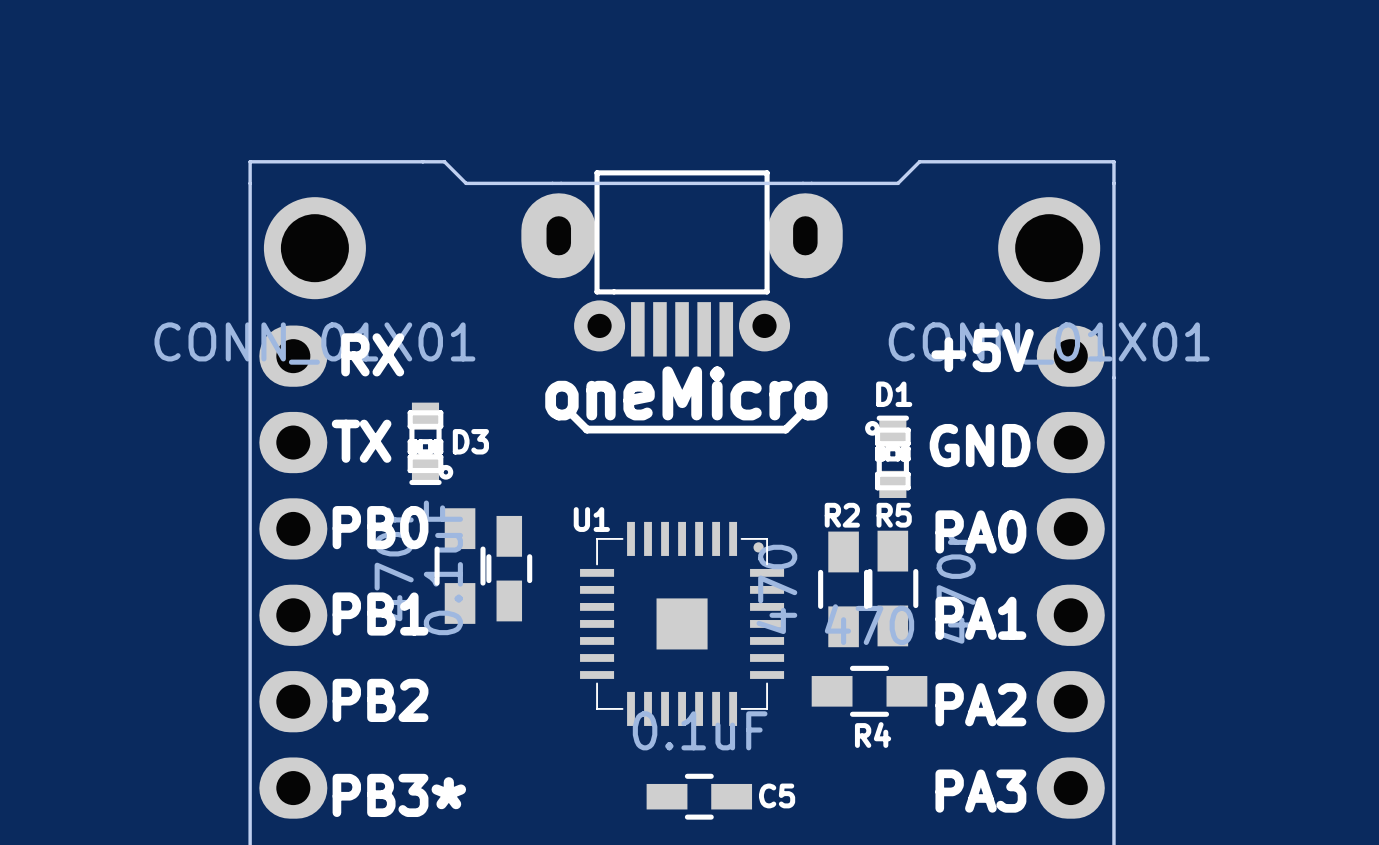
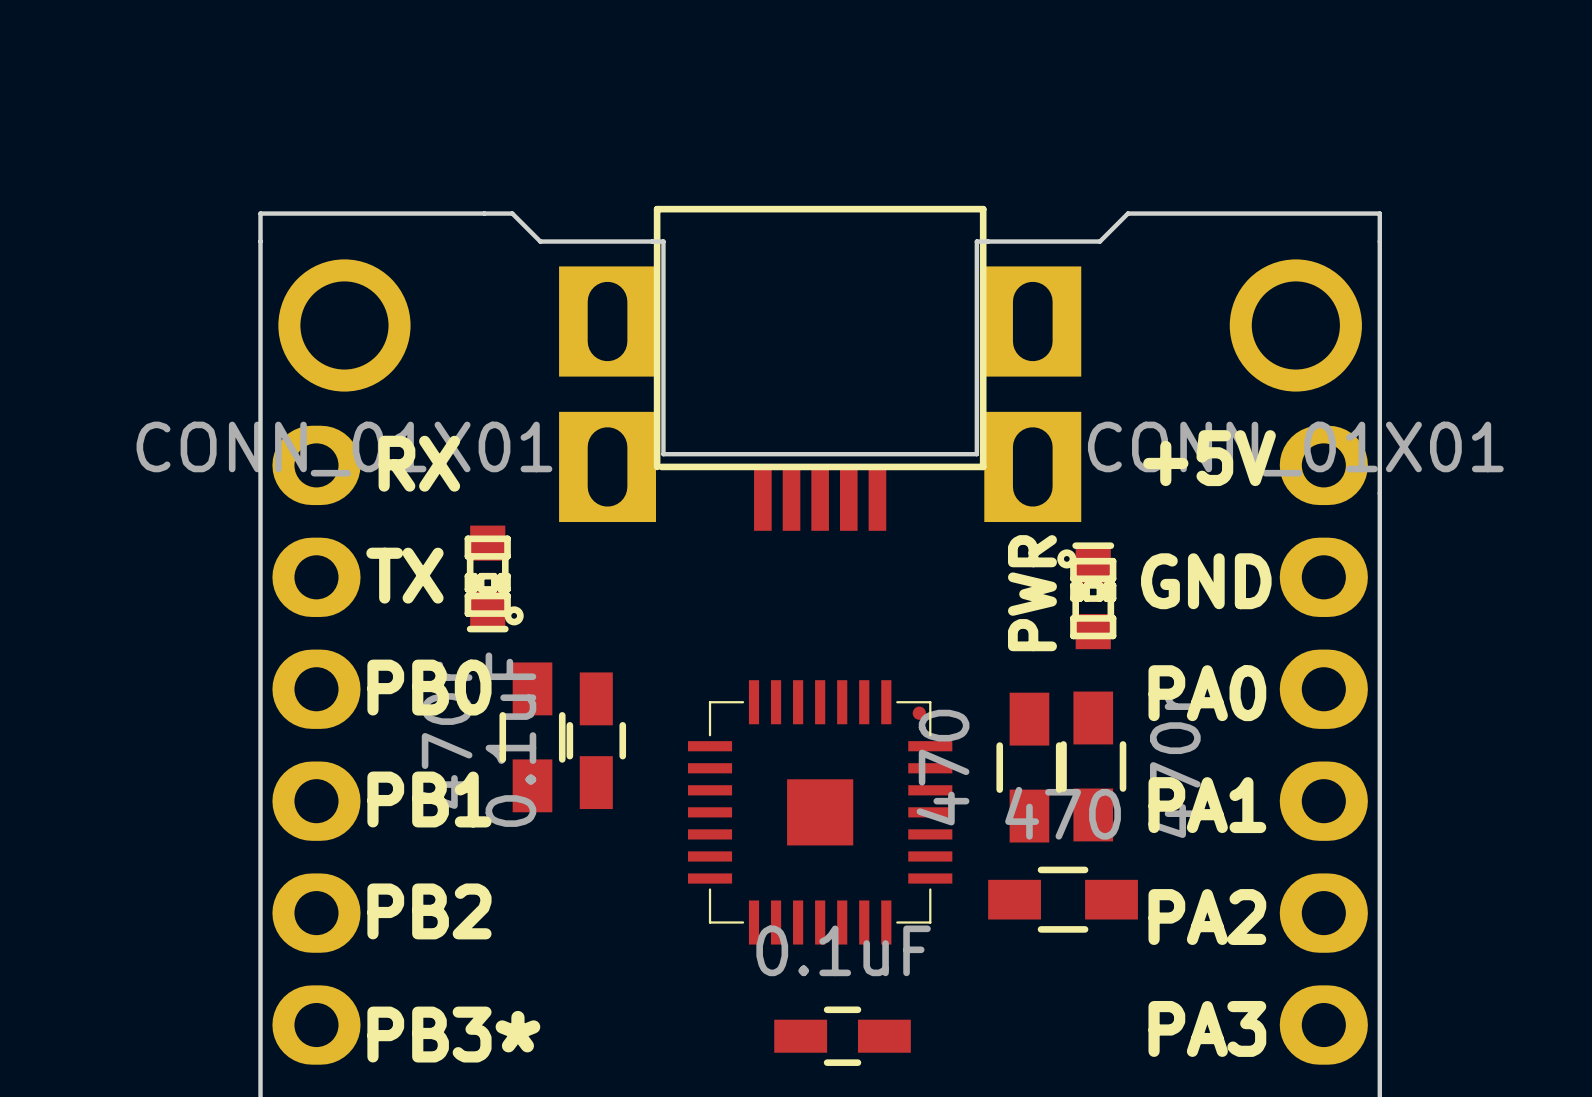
part footprint: [521, 170, 843, 357] -> [559, 205, 1082, 531]
board edge: (561, 183) (802, 183) -> (663, 241) (663, 454) (976, 454) (976, 241)
text: oneMicro (686, 393) -> none
D1 name: D1 (894, 394) -> none
line: (569, 412) (587, 429) (785, 429) (802, 412) -> none
D3 name: D3 (470, 441) -> none
text: none -> PWR (1032, 593)
R2 name: R2 (842, 515) -> none
R5 name: R5 (894, 515) -> none
U1 name: U1 (591, 519) -> none
R4 name: R4 (873, 735) -> none
C5 name: C5 (777, 795) -> none

